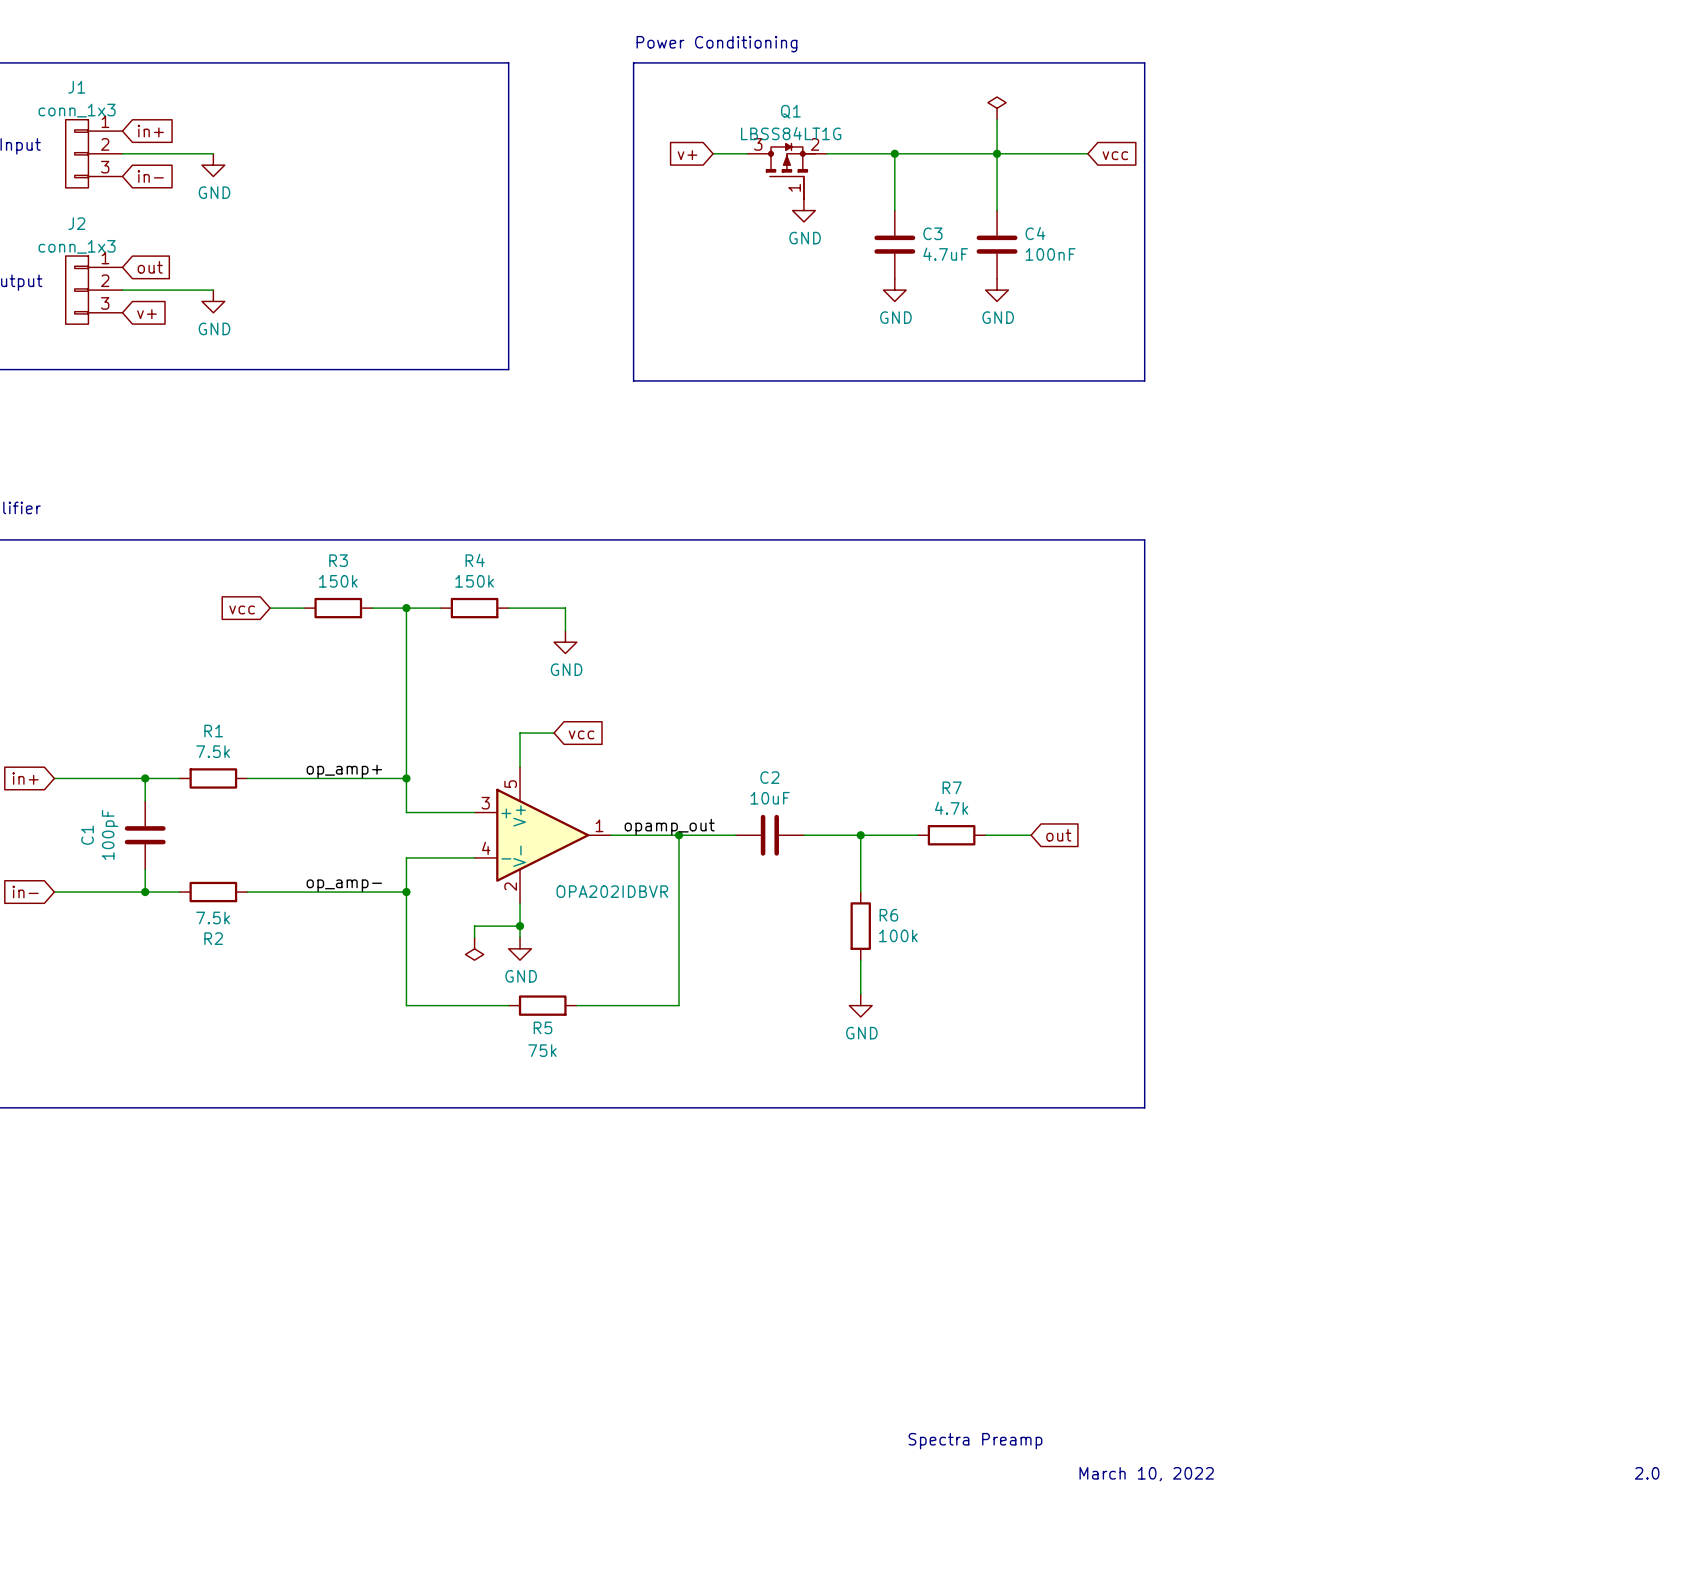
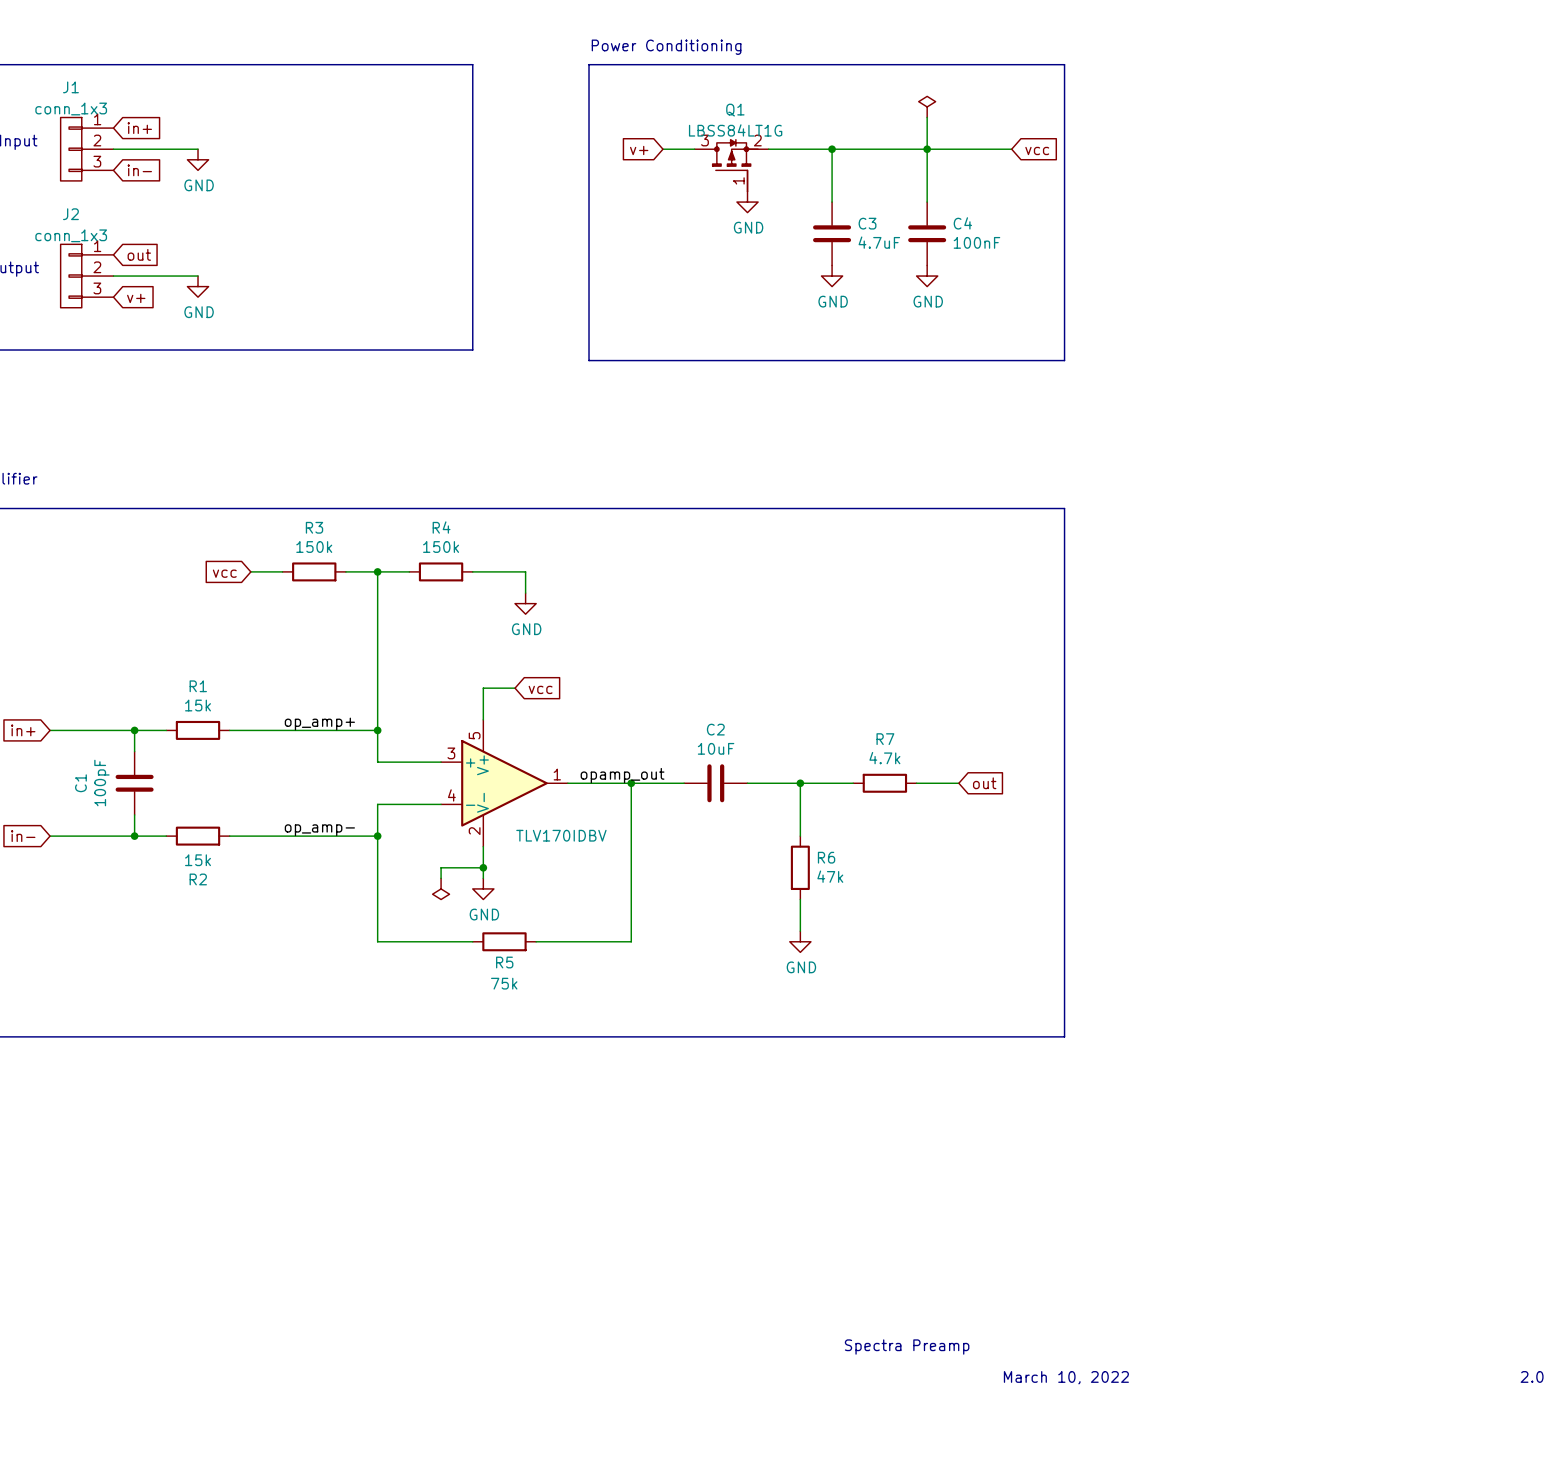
R1 value: 7.5k (213, 751) -> 15k (198, 705)
part value: OPA202IDBVR (612, 891) -> TLV170IDBV (561, 835)
R2 value: 7.5k (213, 917) -> 15k (198, 860)
R6 value: 100k (898, 935) -> 47k (830, 876)

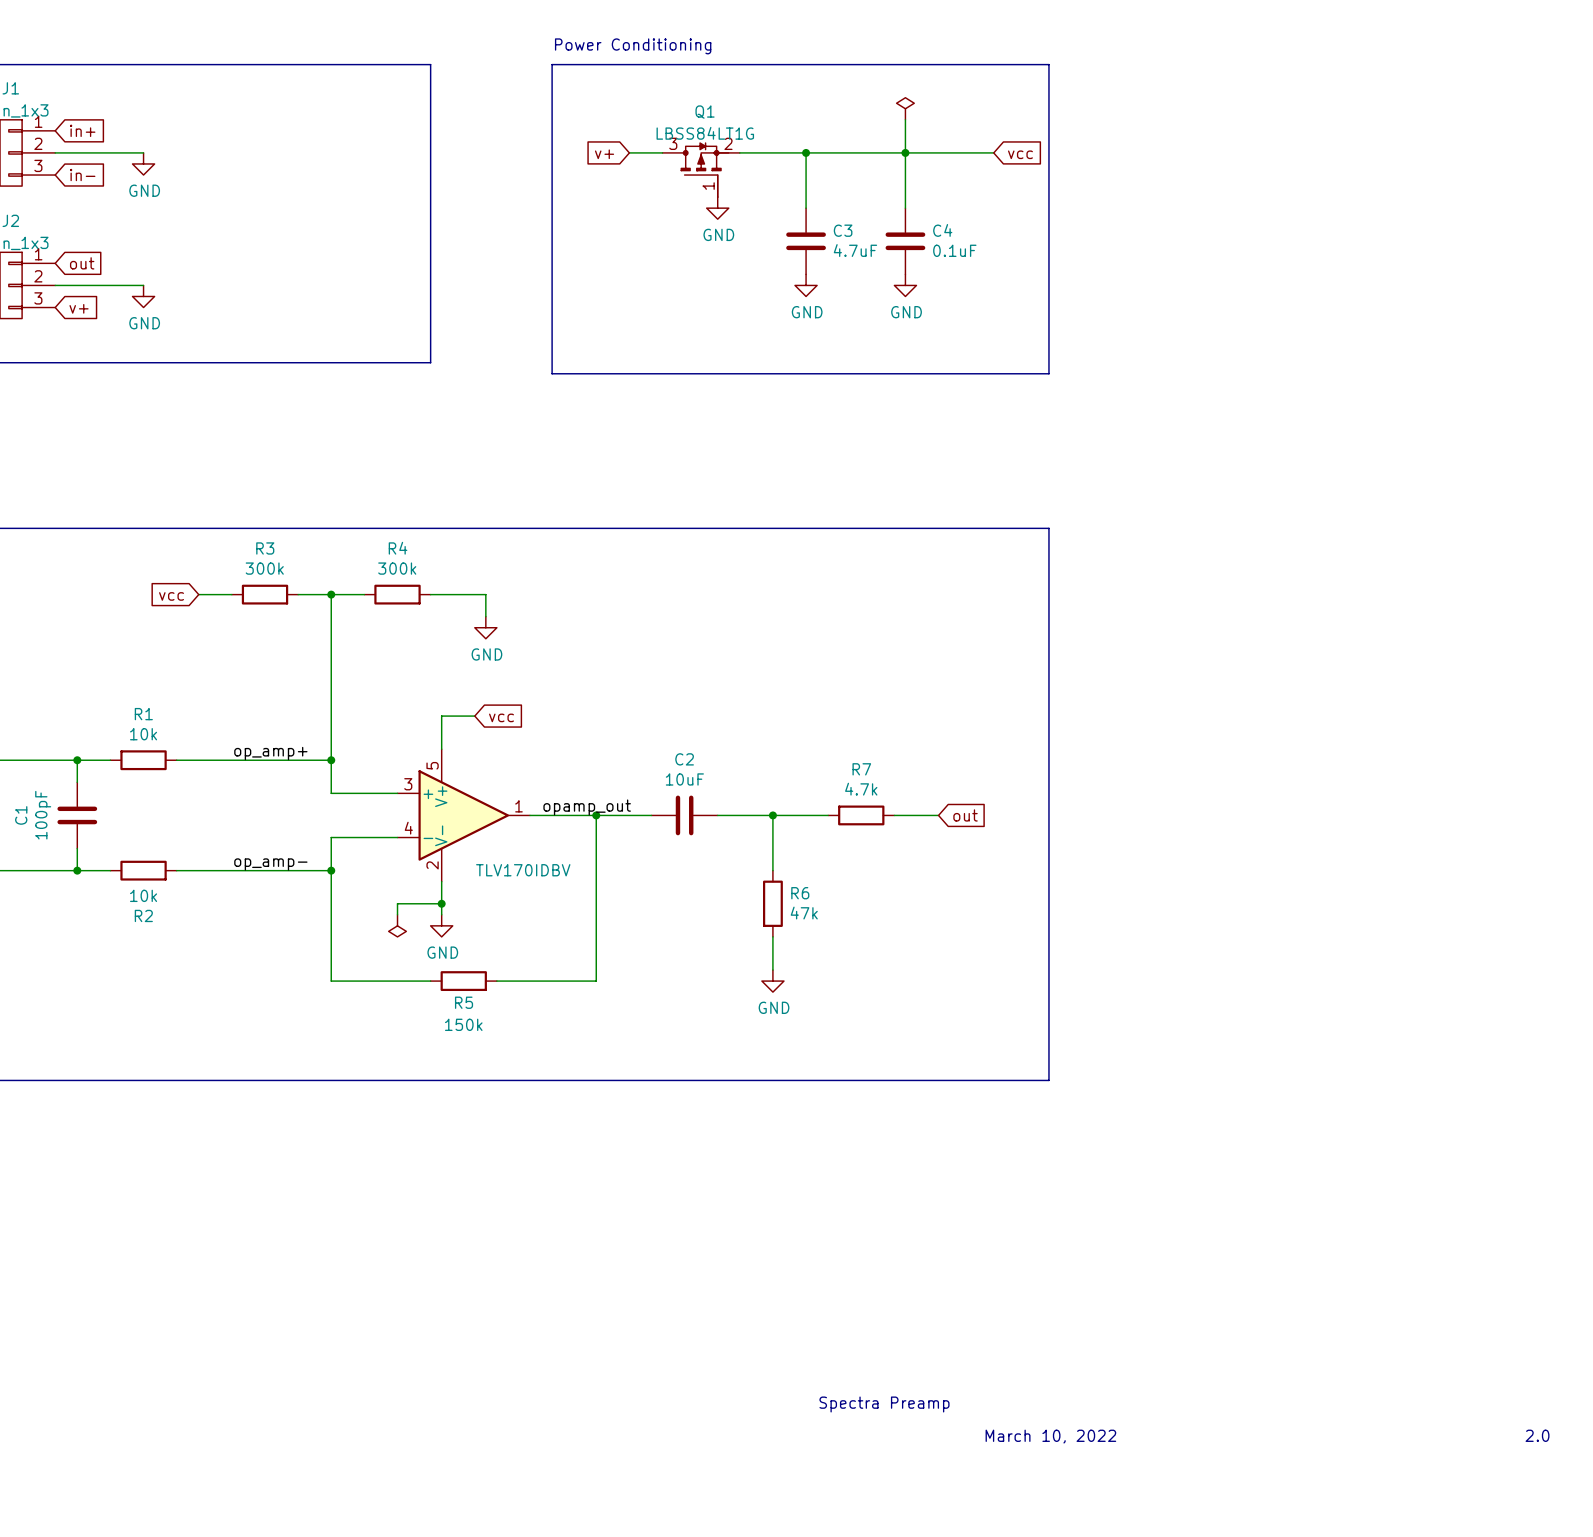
C4 value: 100nF (976, 242) -> 0.1uF (954, 250)
R3 value: 150k (314, 547) -> 300k (264, 568)
R4 value: 150k (441, 547) -> 300k (397, 568)
R1 value: 15k (198, 705) -> 10k (143, 734)
R2 value: 15k (198, 860) -> 10k (143, 895)
R5 value: 75k (504, 983) -> 150k (463, 1024)

